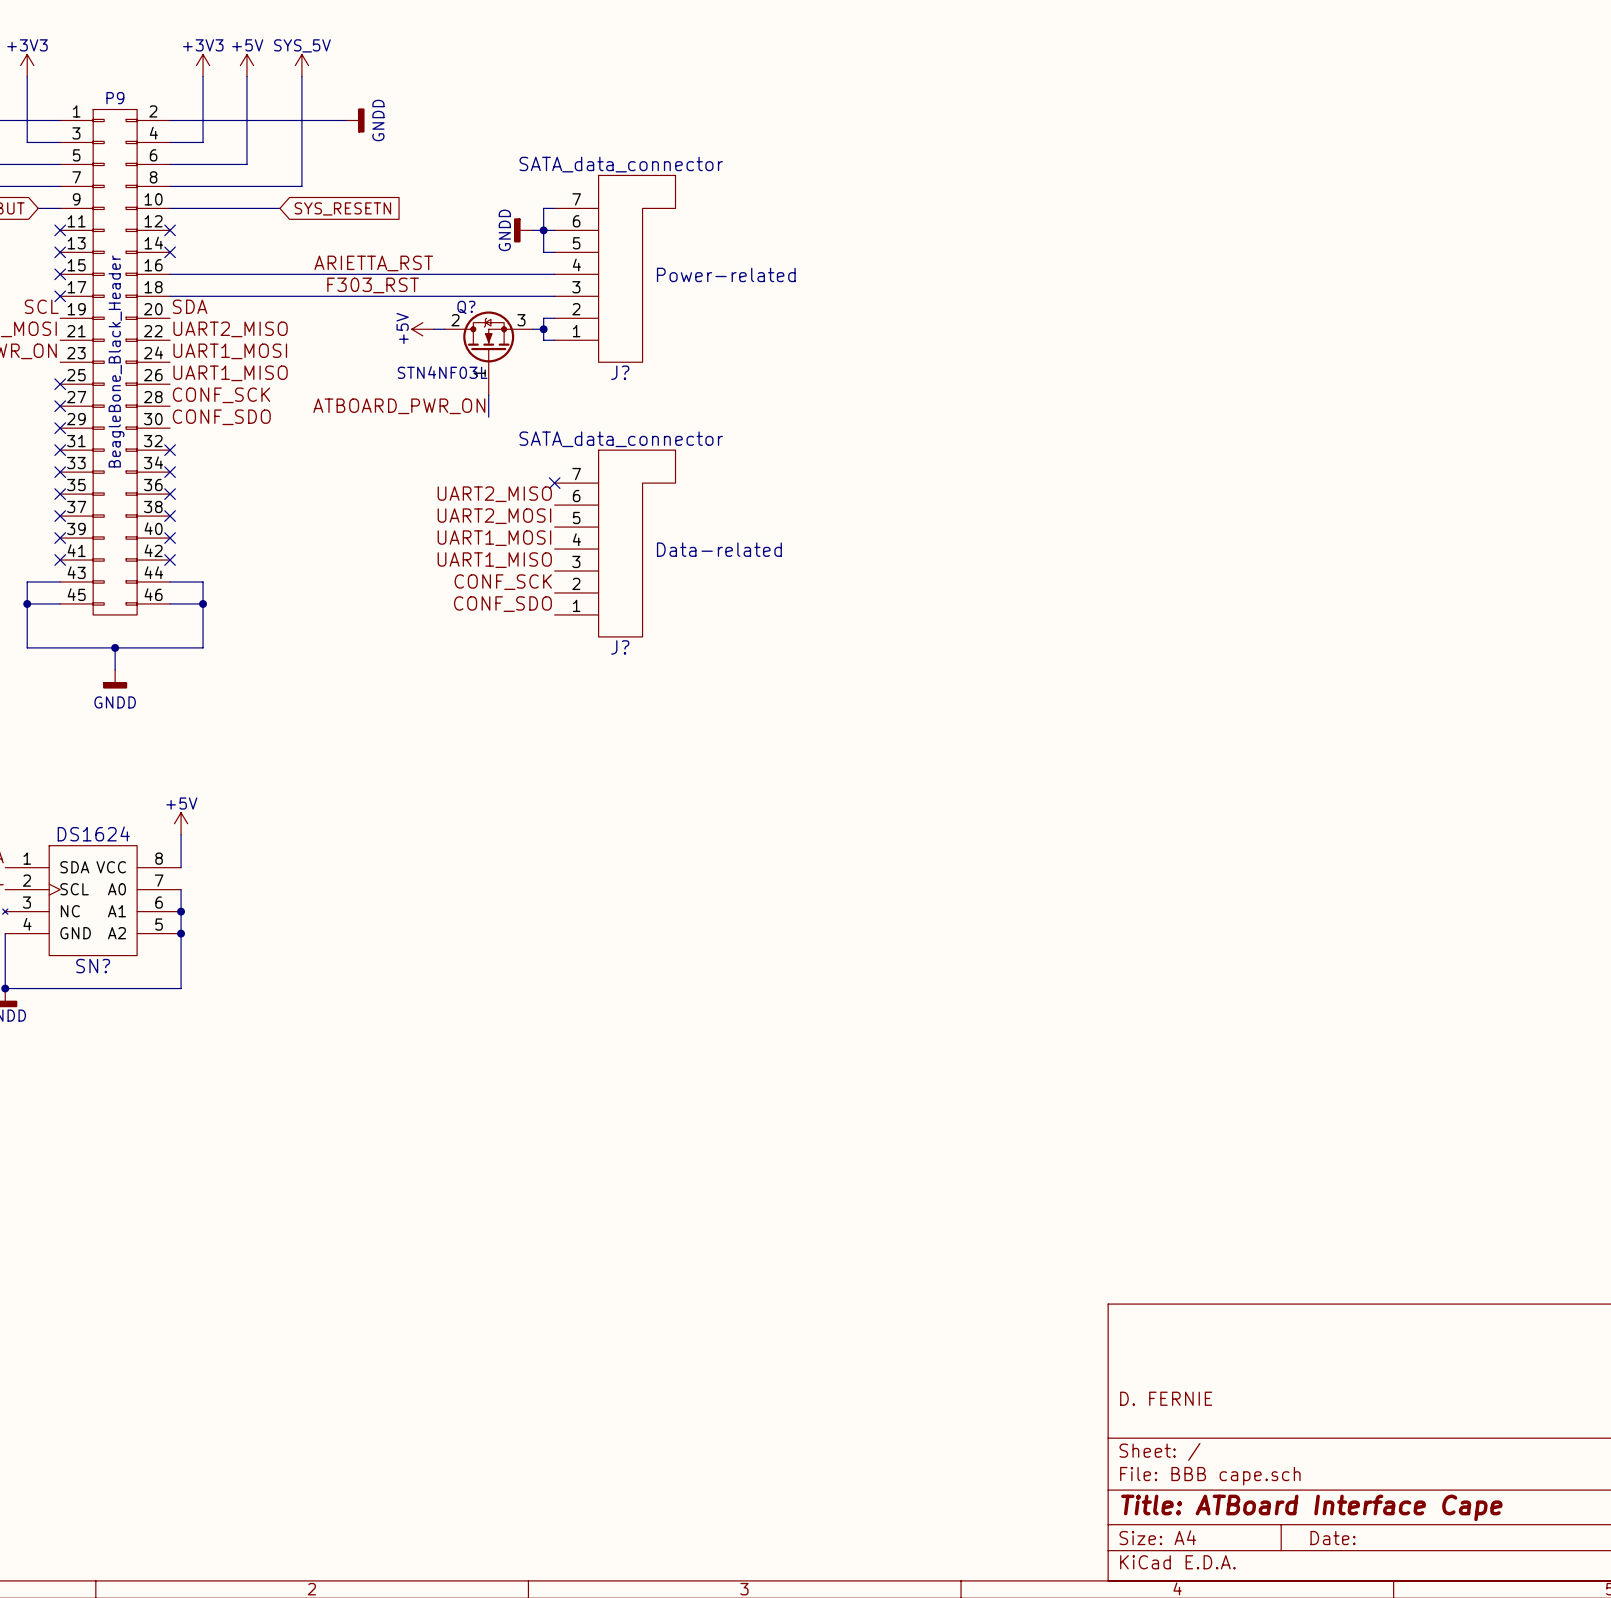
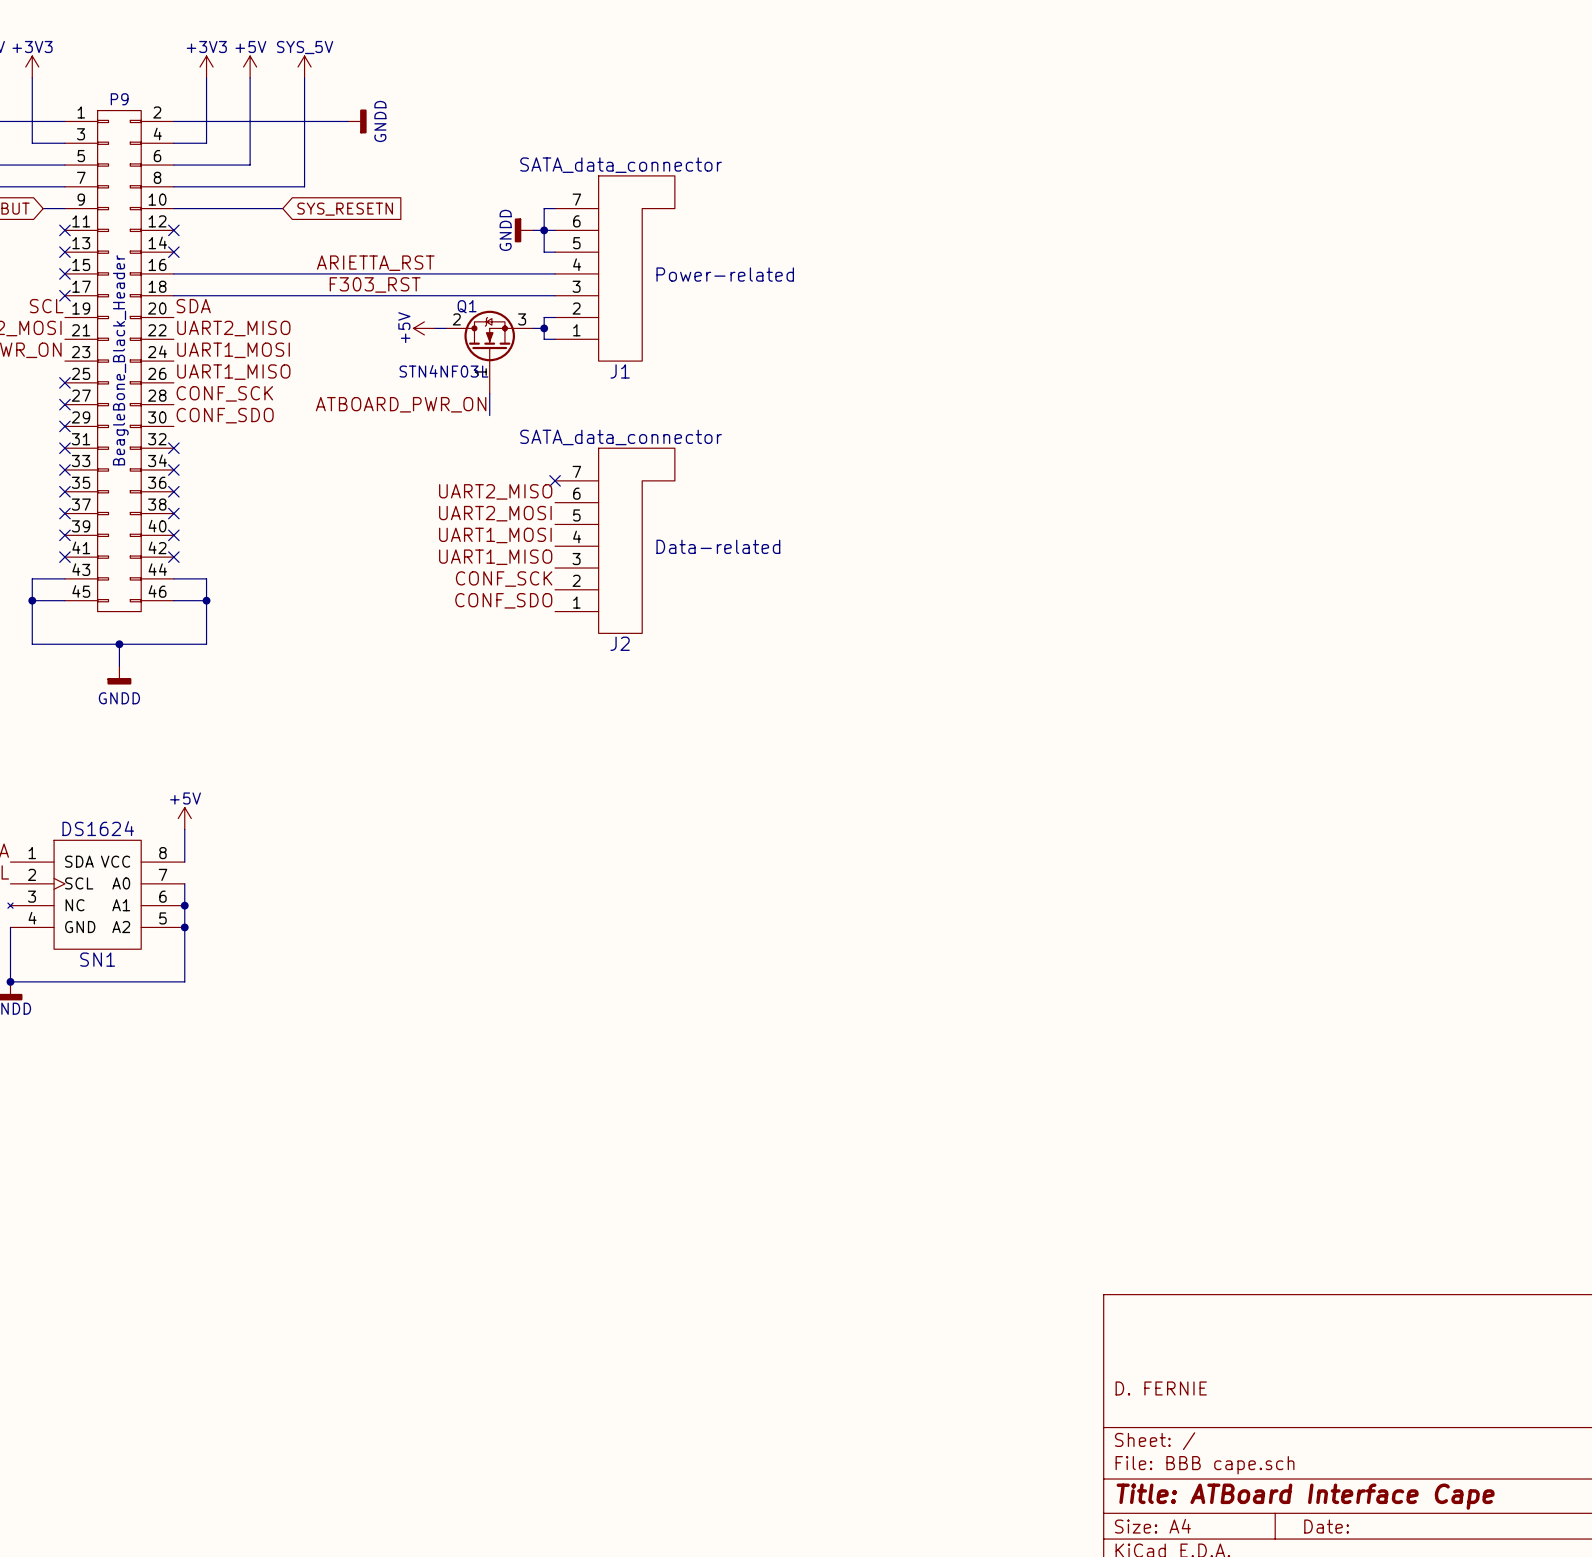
Q? name: Q? (466, 307) -> Q1 (467, 306)
J? name: J? (620, 372) -> J1 (620, 371)
J? name: J? (620, 647) -> J2 (620, 643)
SN? name: SN? (93, 966) -> SN1 (97, 959)

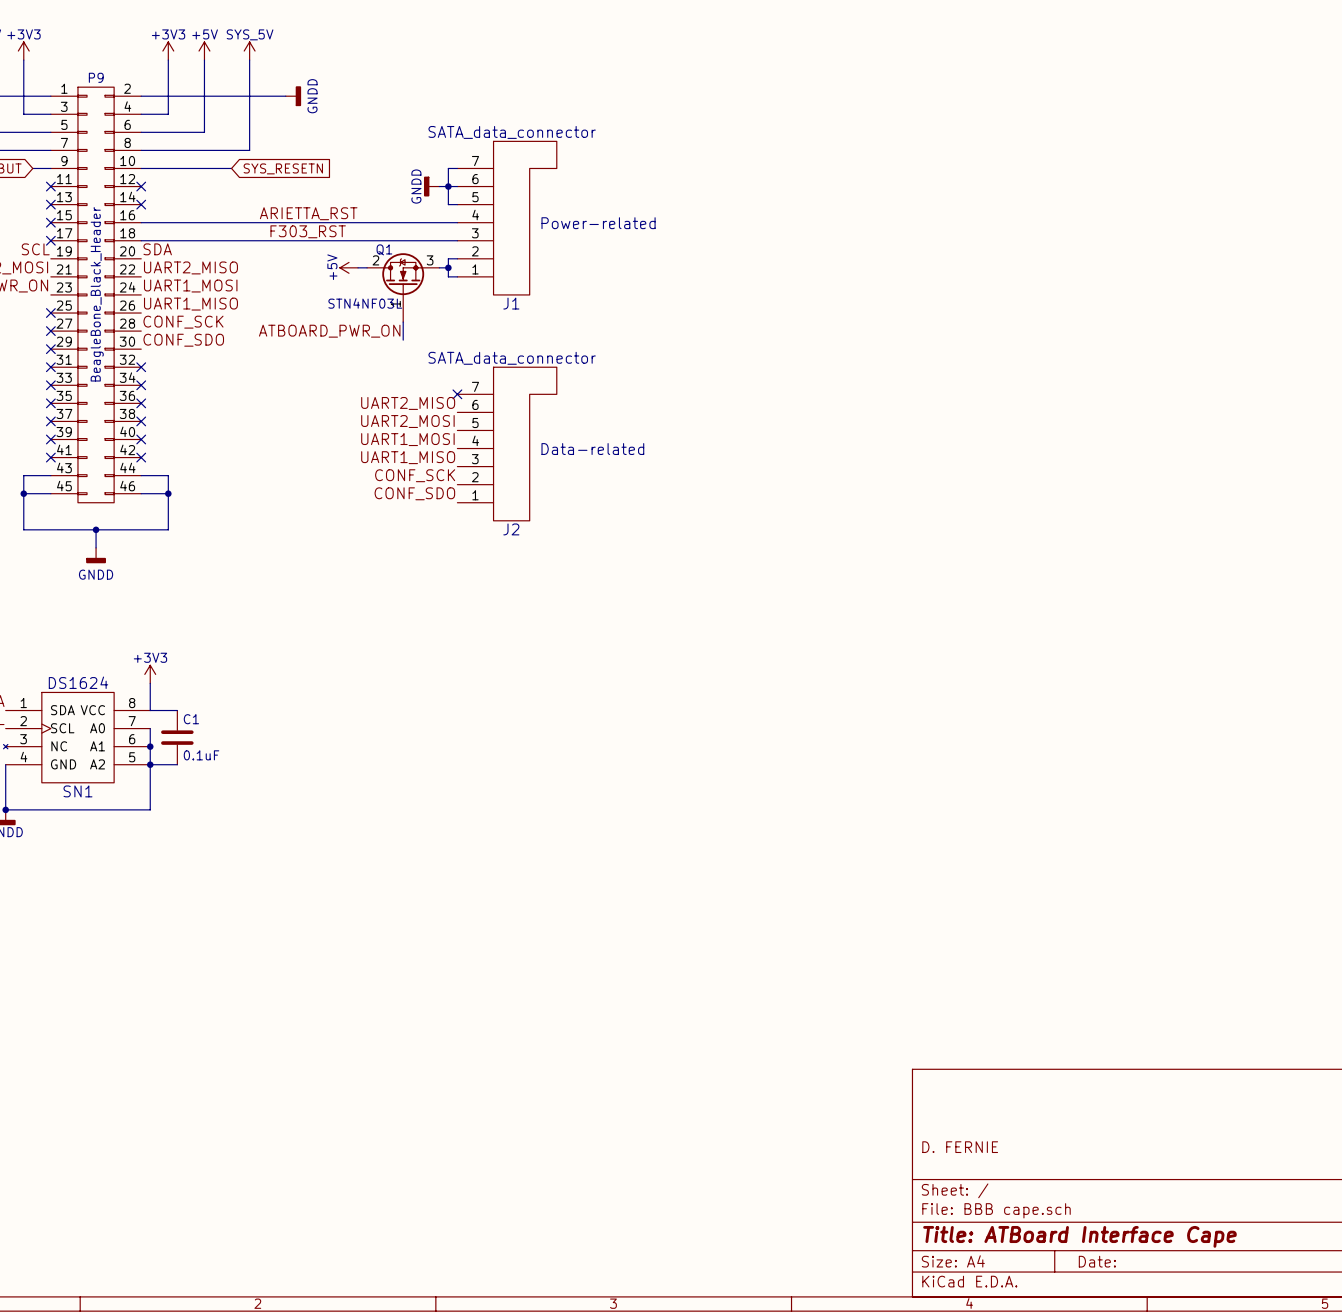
power symbol: +5V (184, 818) -> +3V3 (150, 674)
wire: none -> (150, 710) (177, 710)
C1: none -> 0.1uF (177, 737)
wire: none -> (150, 764) (177, 764)

